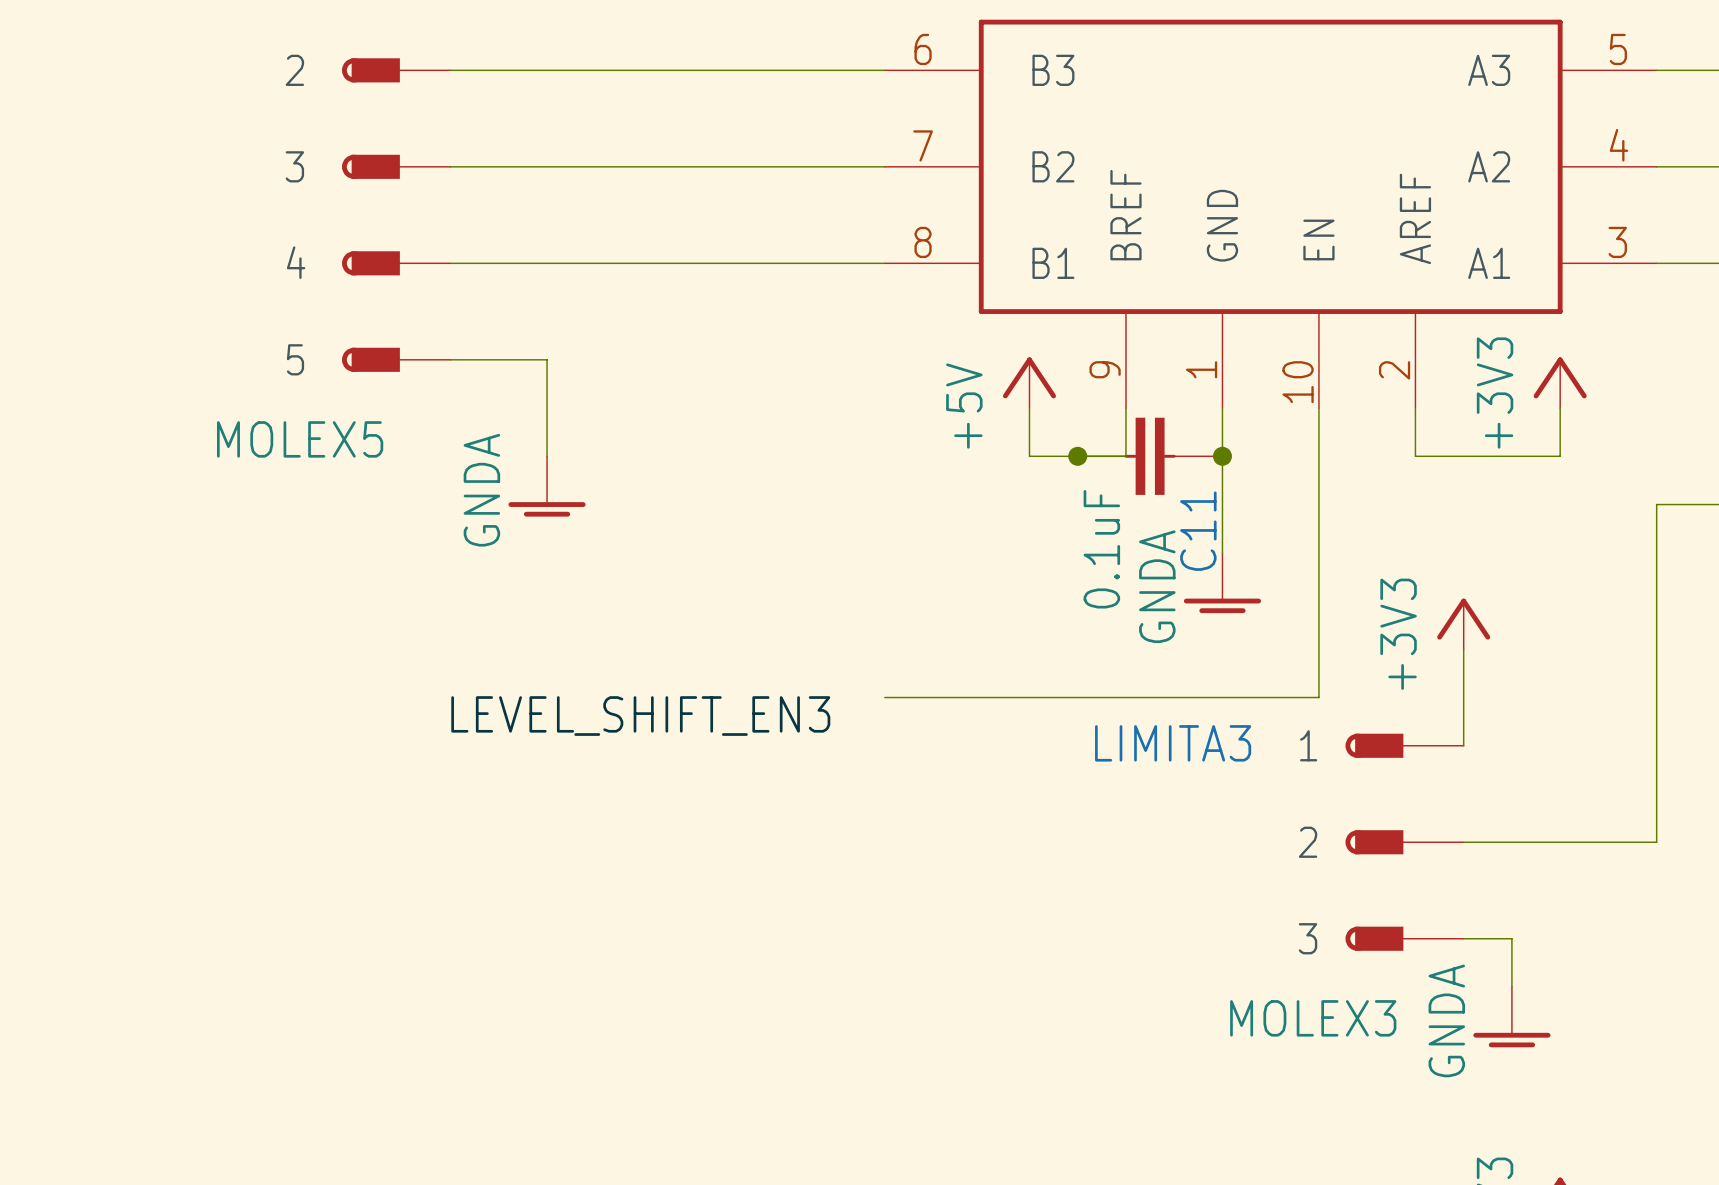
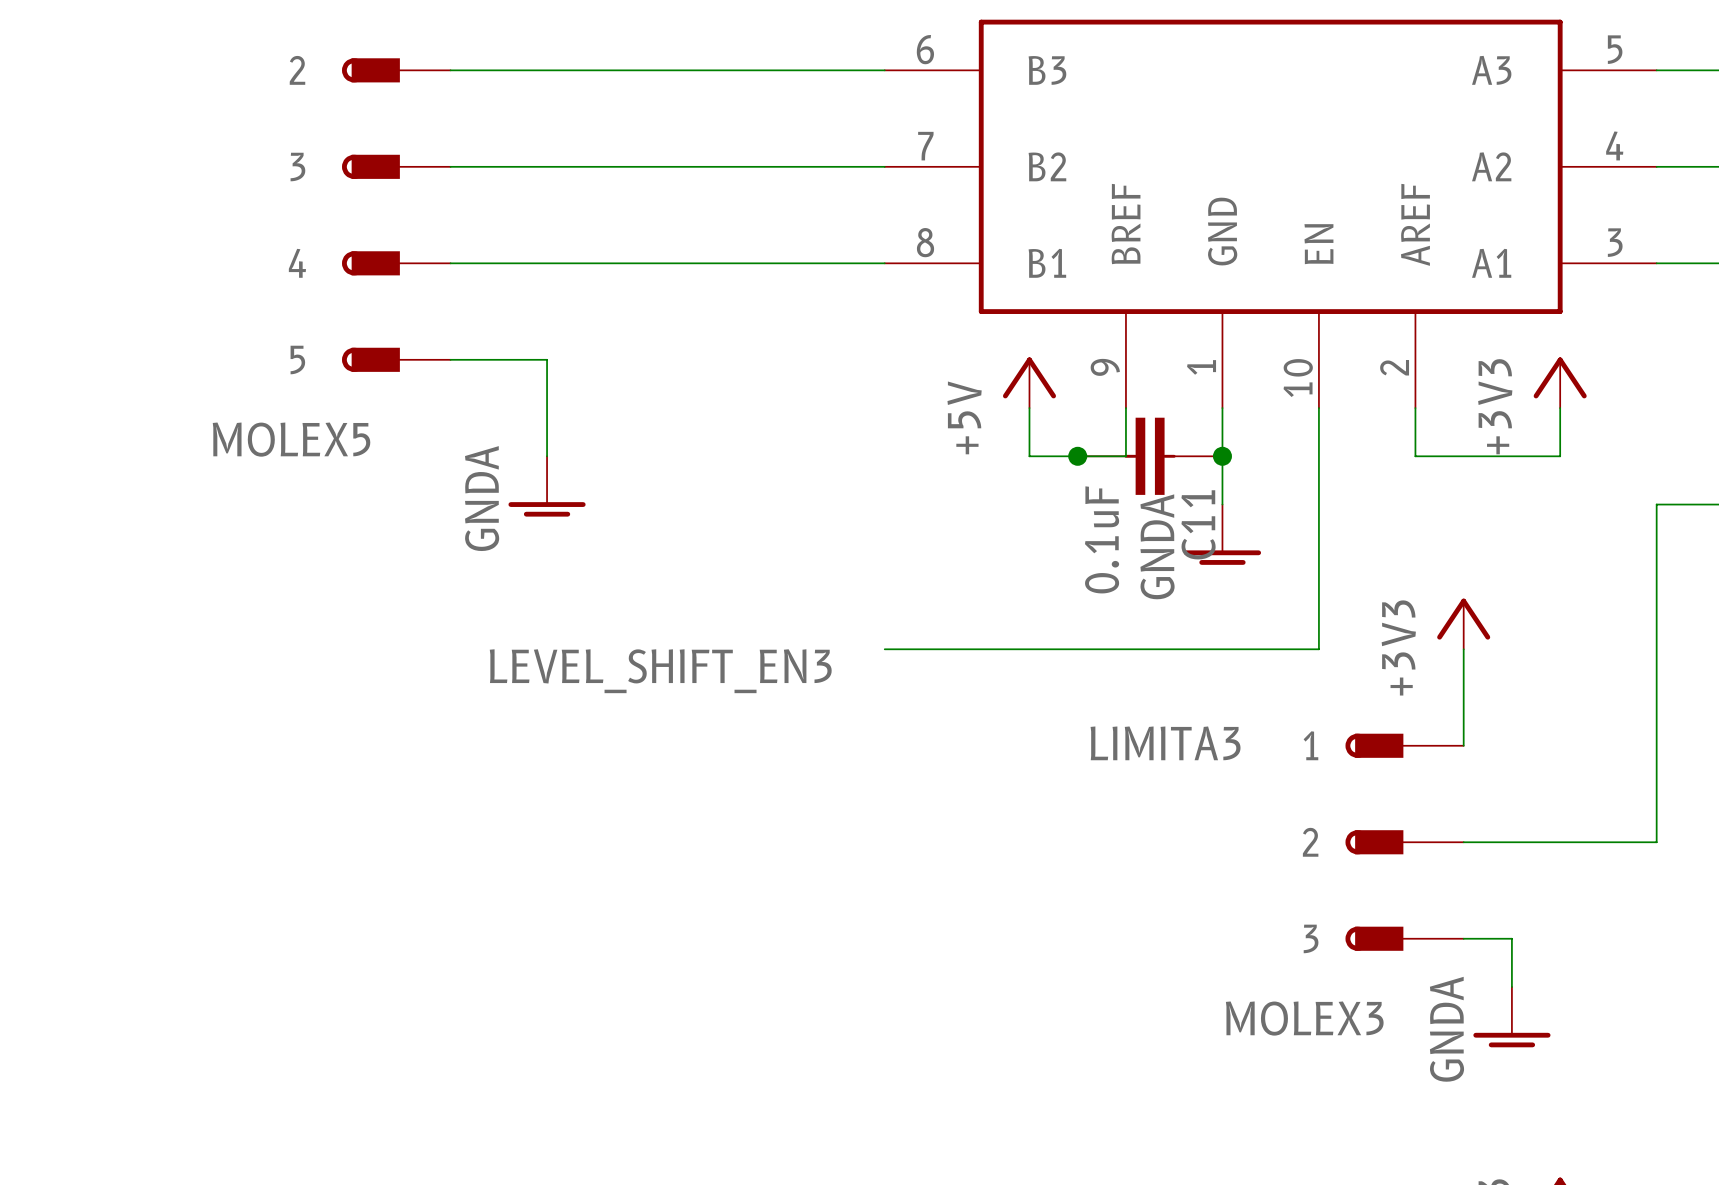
power symbol position: GNDA (1222, 582) -> GNDA (1222, 534)
wire: (1318, 649) (1318, 697) (884, 697) -> (1318, 649) (884, 649)
label position: LEVEL_SHIFT_EN3 (640, 716) -> LEVEL_SHIFT_EN3 (660, 671)

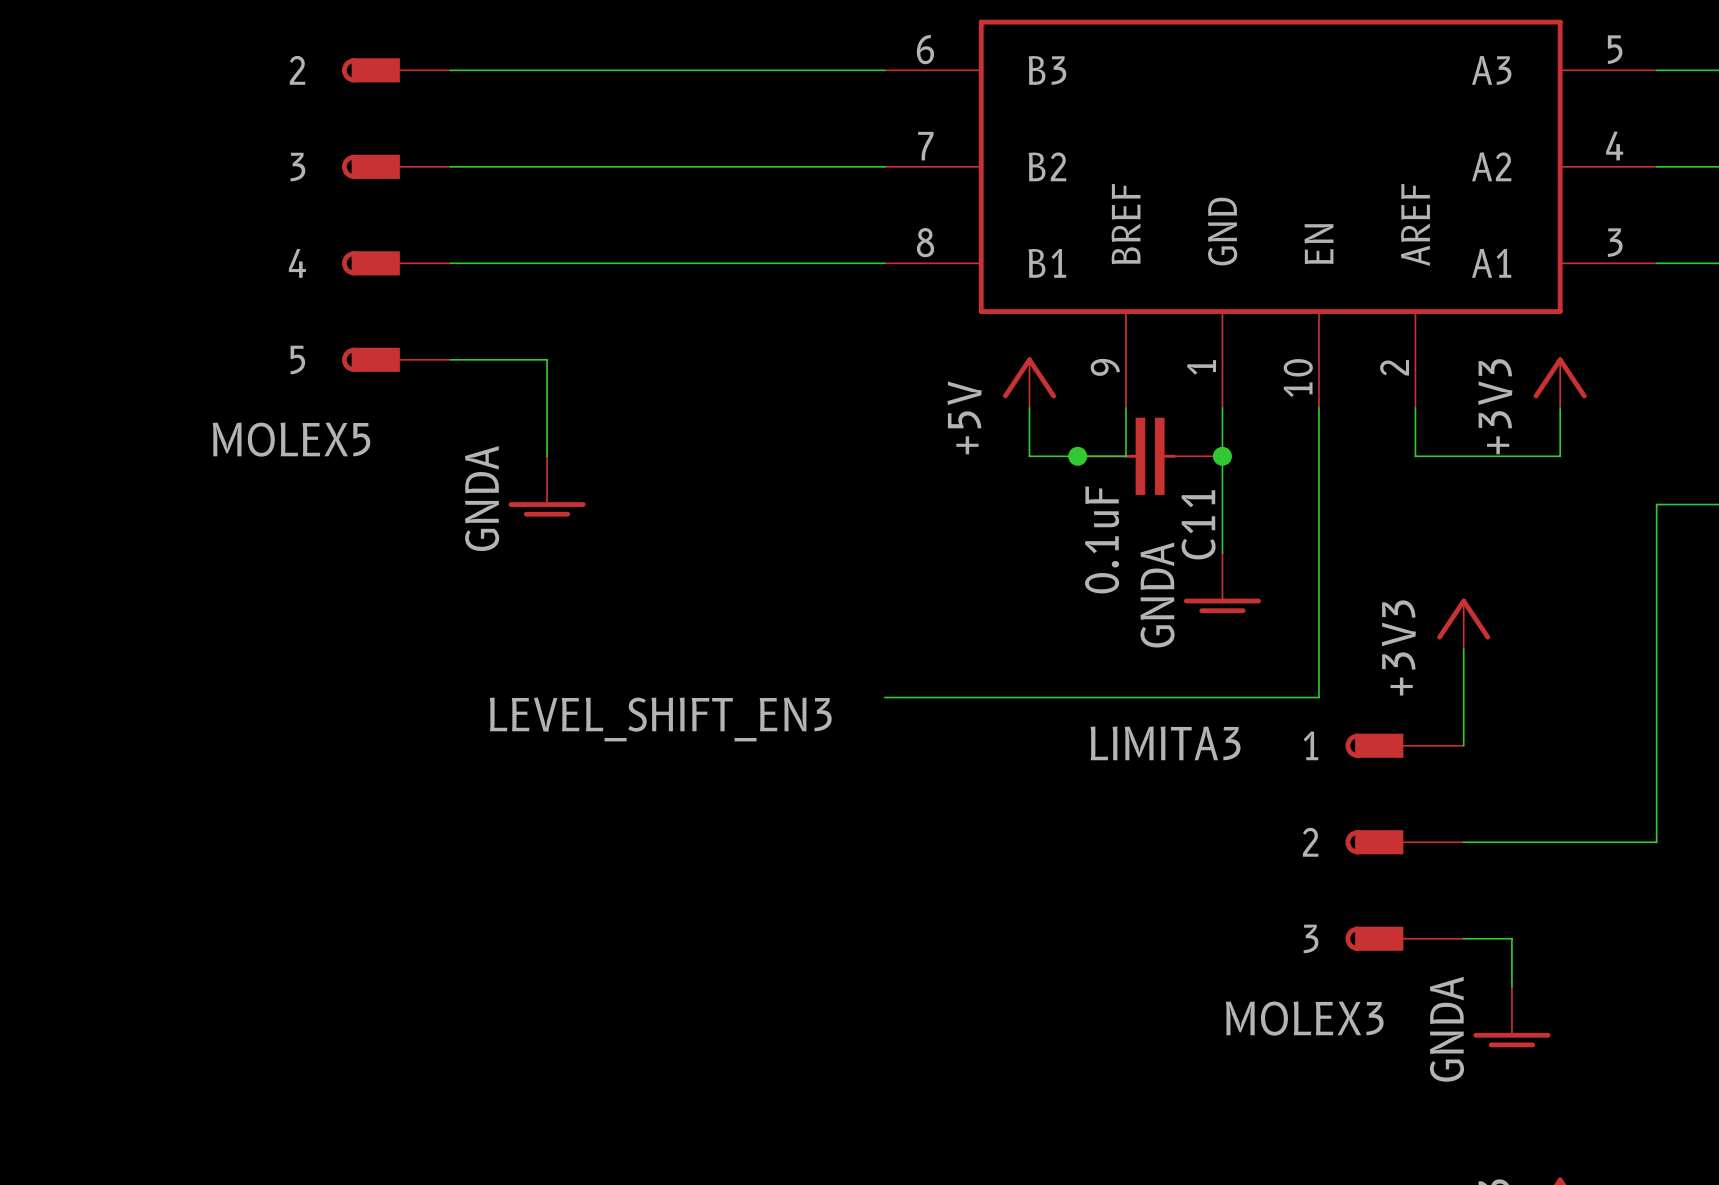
power symbol position: GNDA (1222, 534) -> GNDA (1222, 582)
wire: (884, 649) (1318, 649) -> (884, 697) (1318, 697) (1318, 649)
label position: LEVEL_SHIFT_EN3 (660, 671) -> LEVEL_SHIFT_EN3 (660, 719)

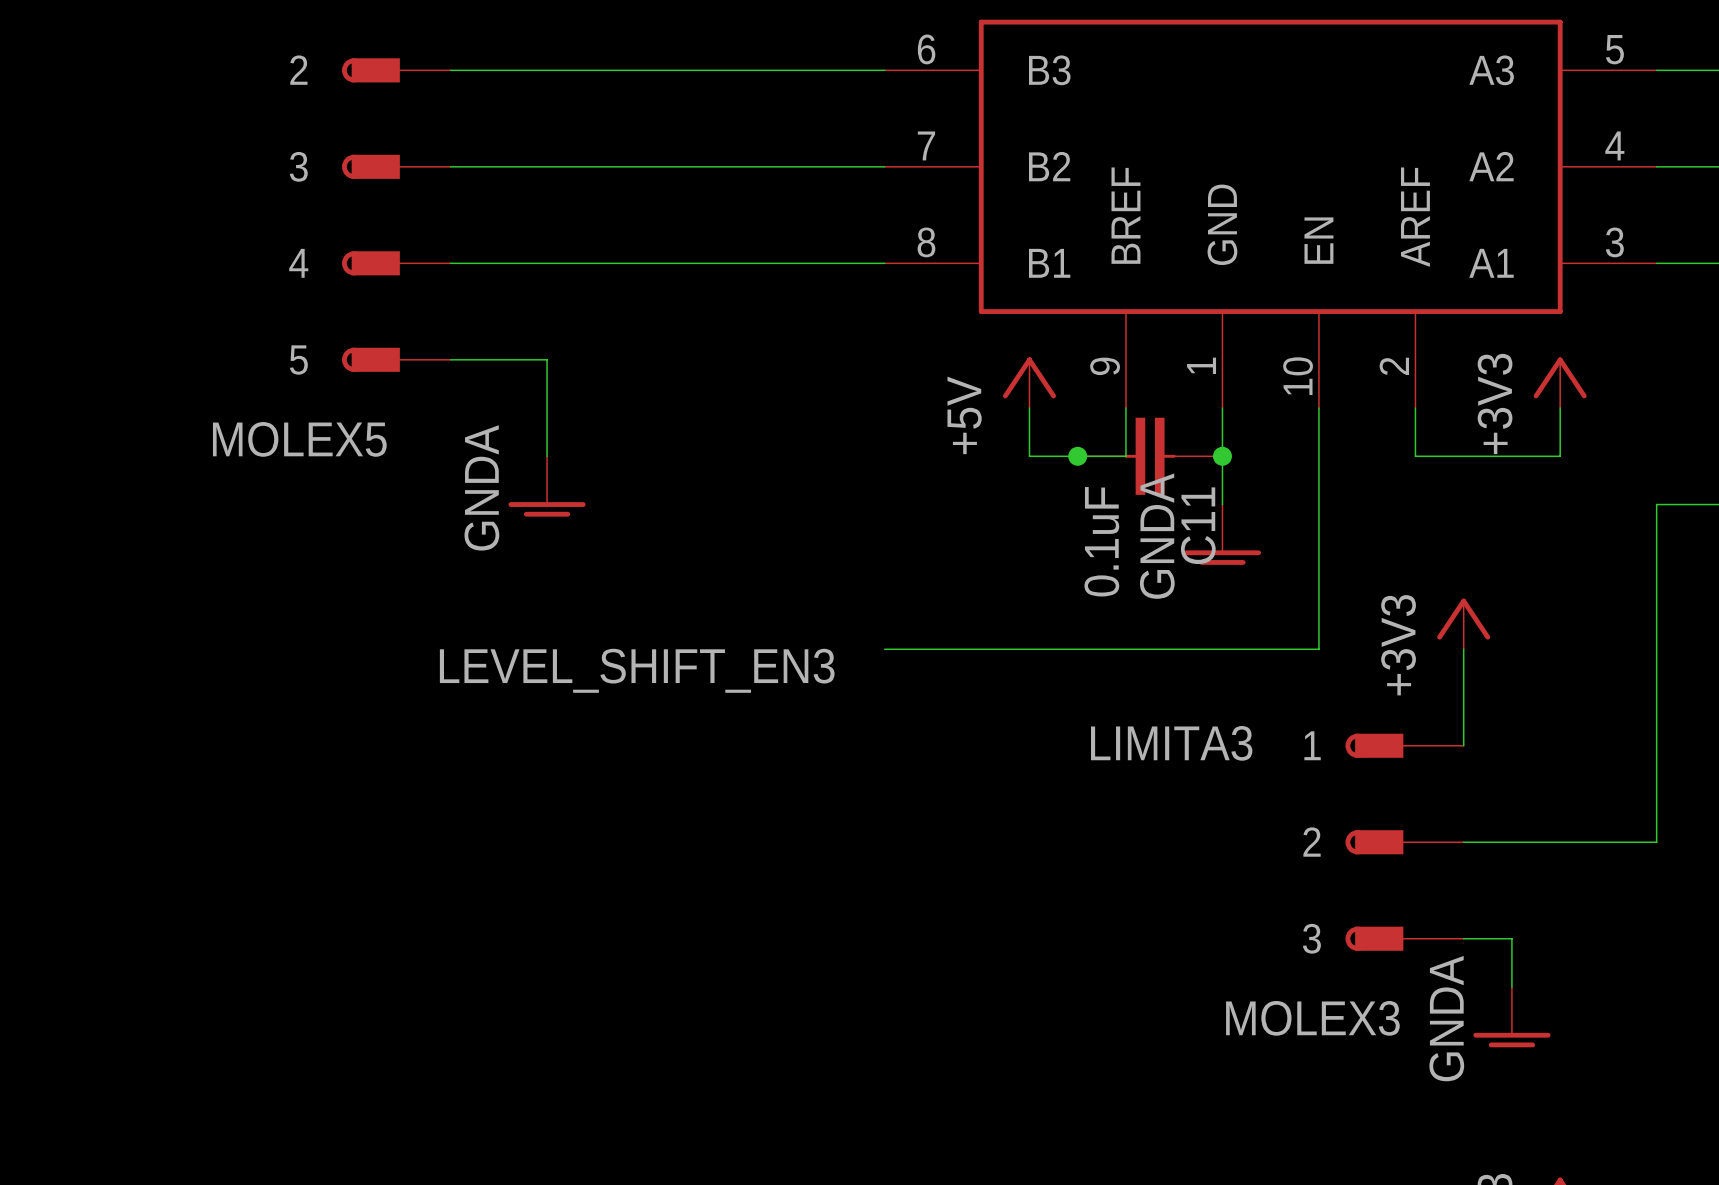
power symbol position: GNDA (1222, 582) -> GNDA (1222, 534)
wire: (1318, 649) (1318, 697) (884, 697) -> (1318, 649) (884, 649)
label position: LEVEL_SHIFT_EN3 (660, 719) -> LEVEL_SHIFT_EN3 (637, 670)

